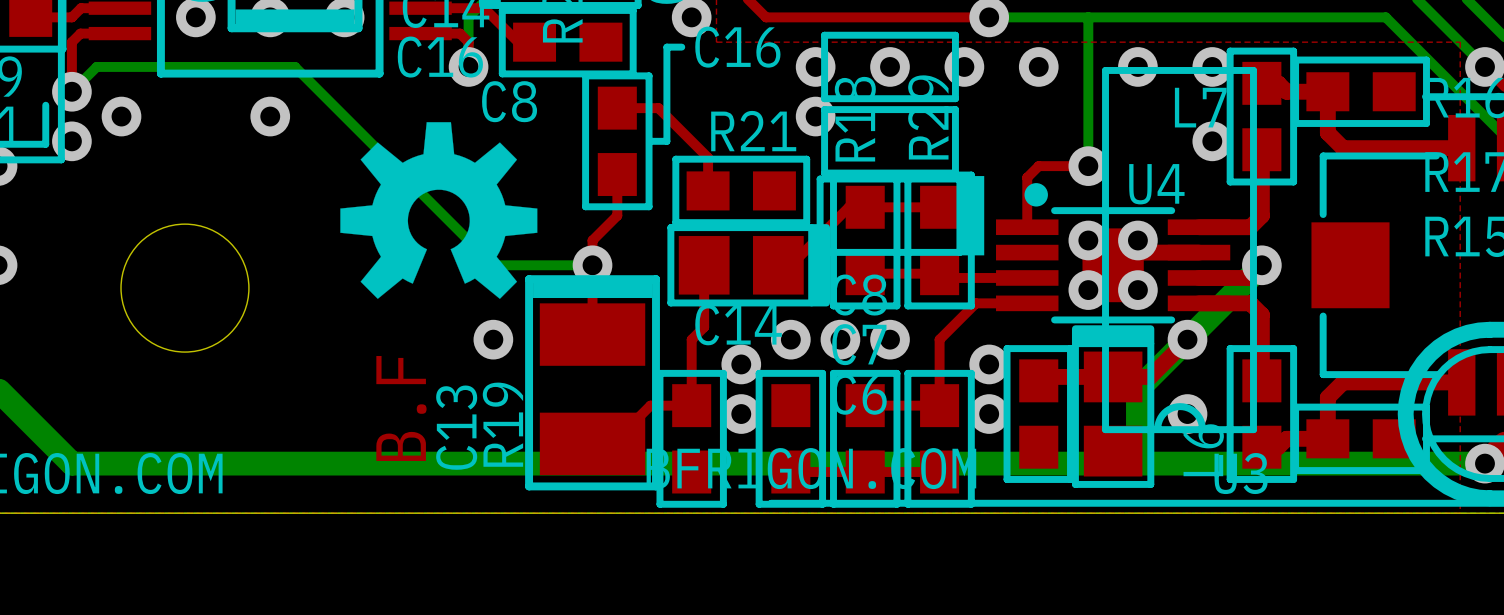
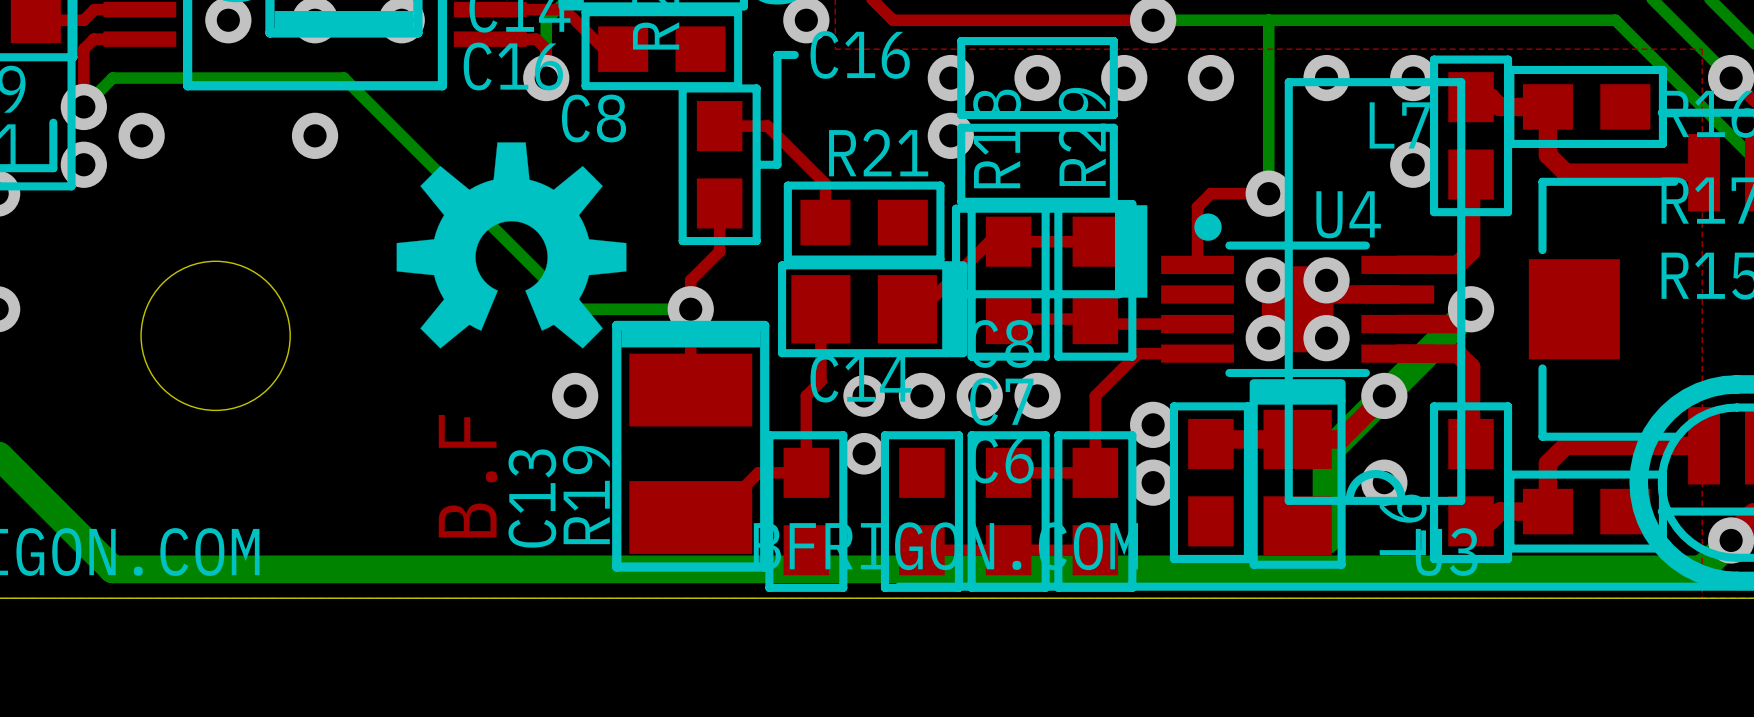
via: none -> (864, 395)
via: (741, 364) -> none
via: none -> (864, 453)
via: (741, 414) -> none
bottom track: (71, 463) (1484, 463) -> (83, 540) (112, 569) (1702, 569) (1731, 540)

